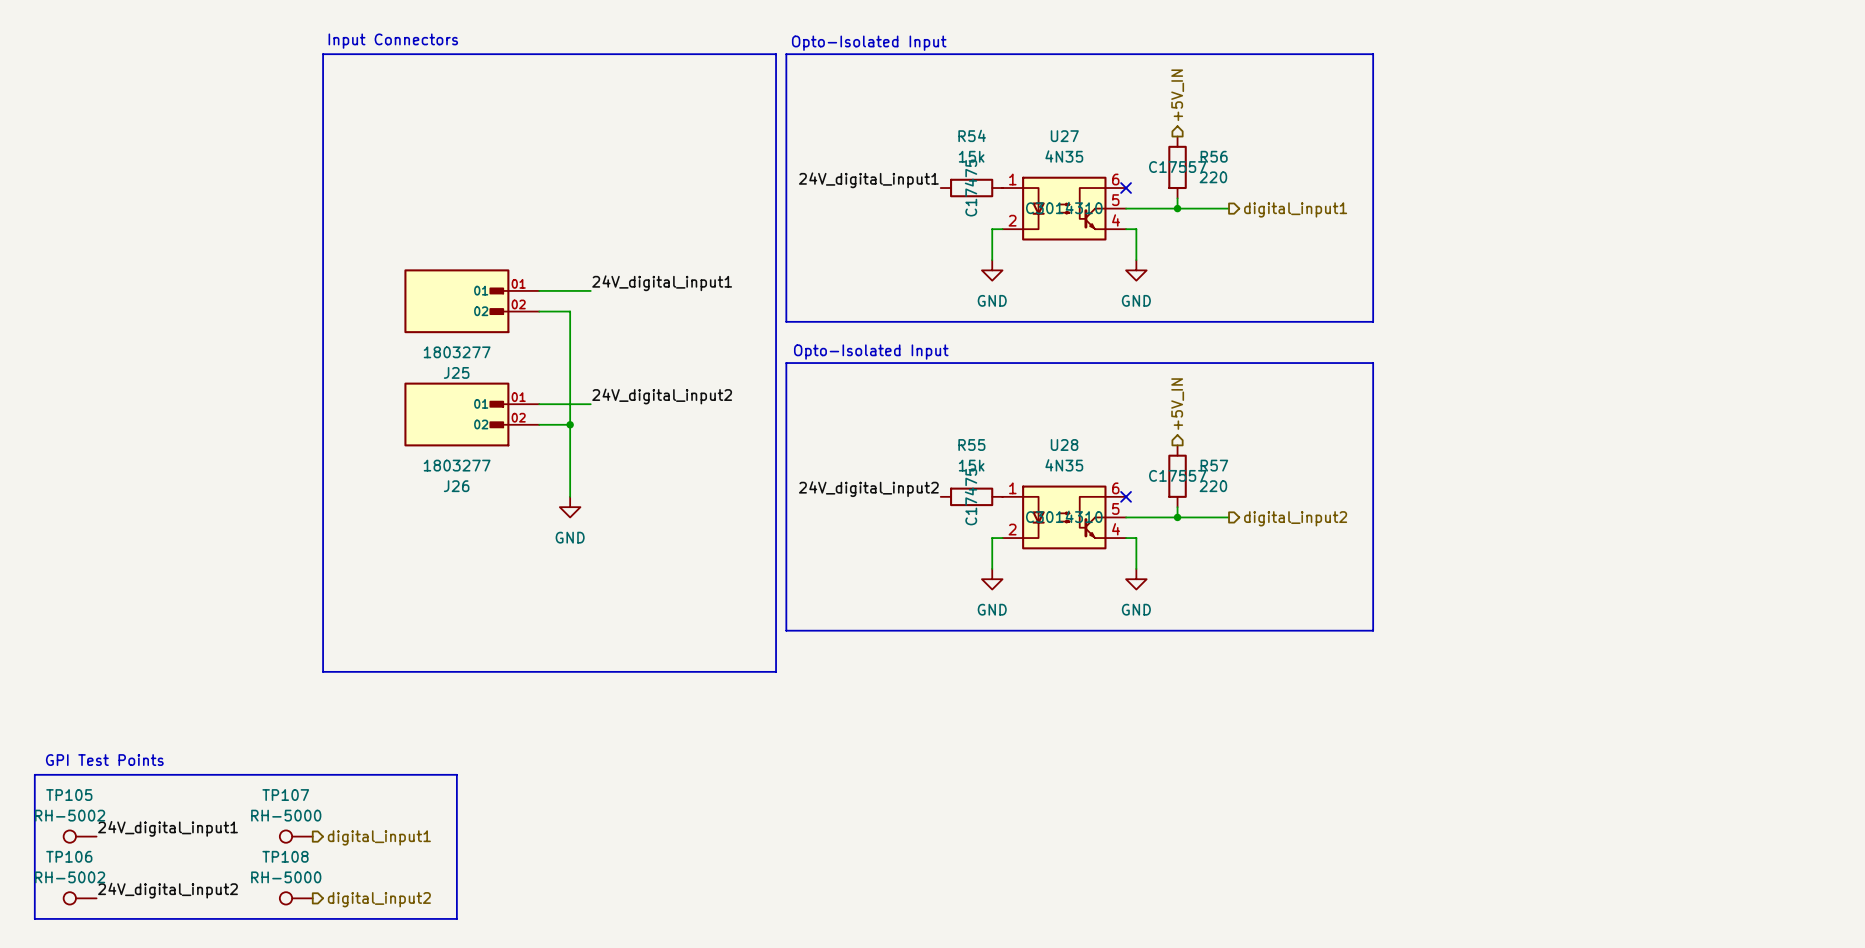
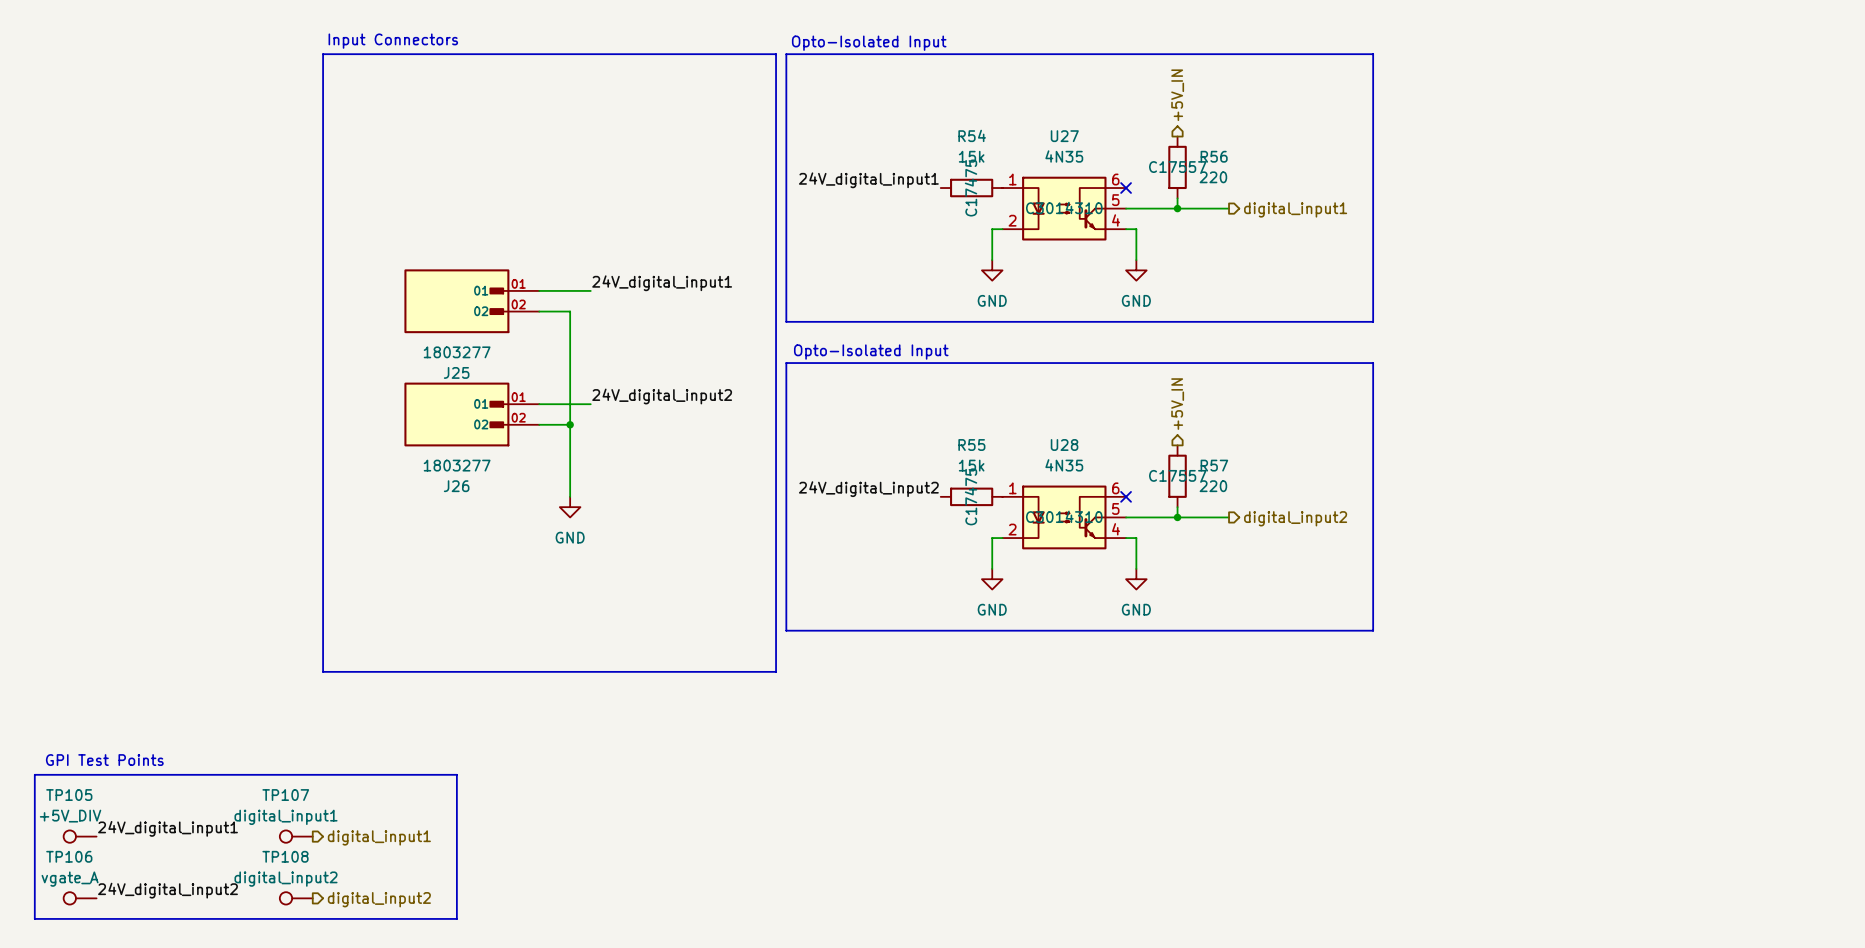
TP105 value: RH-5002 (70, 815) -> +5V_DIV (70, 816)
TP107 value: RH-5000 (286, 815) -> digital_input1 (286, 817)
TP106 value: RH-5002 (70, 877) -> vgate_A (70, 879)
TP108 value: RH-5000 (286, 877) -> digital_input2 (286, 879)

